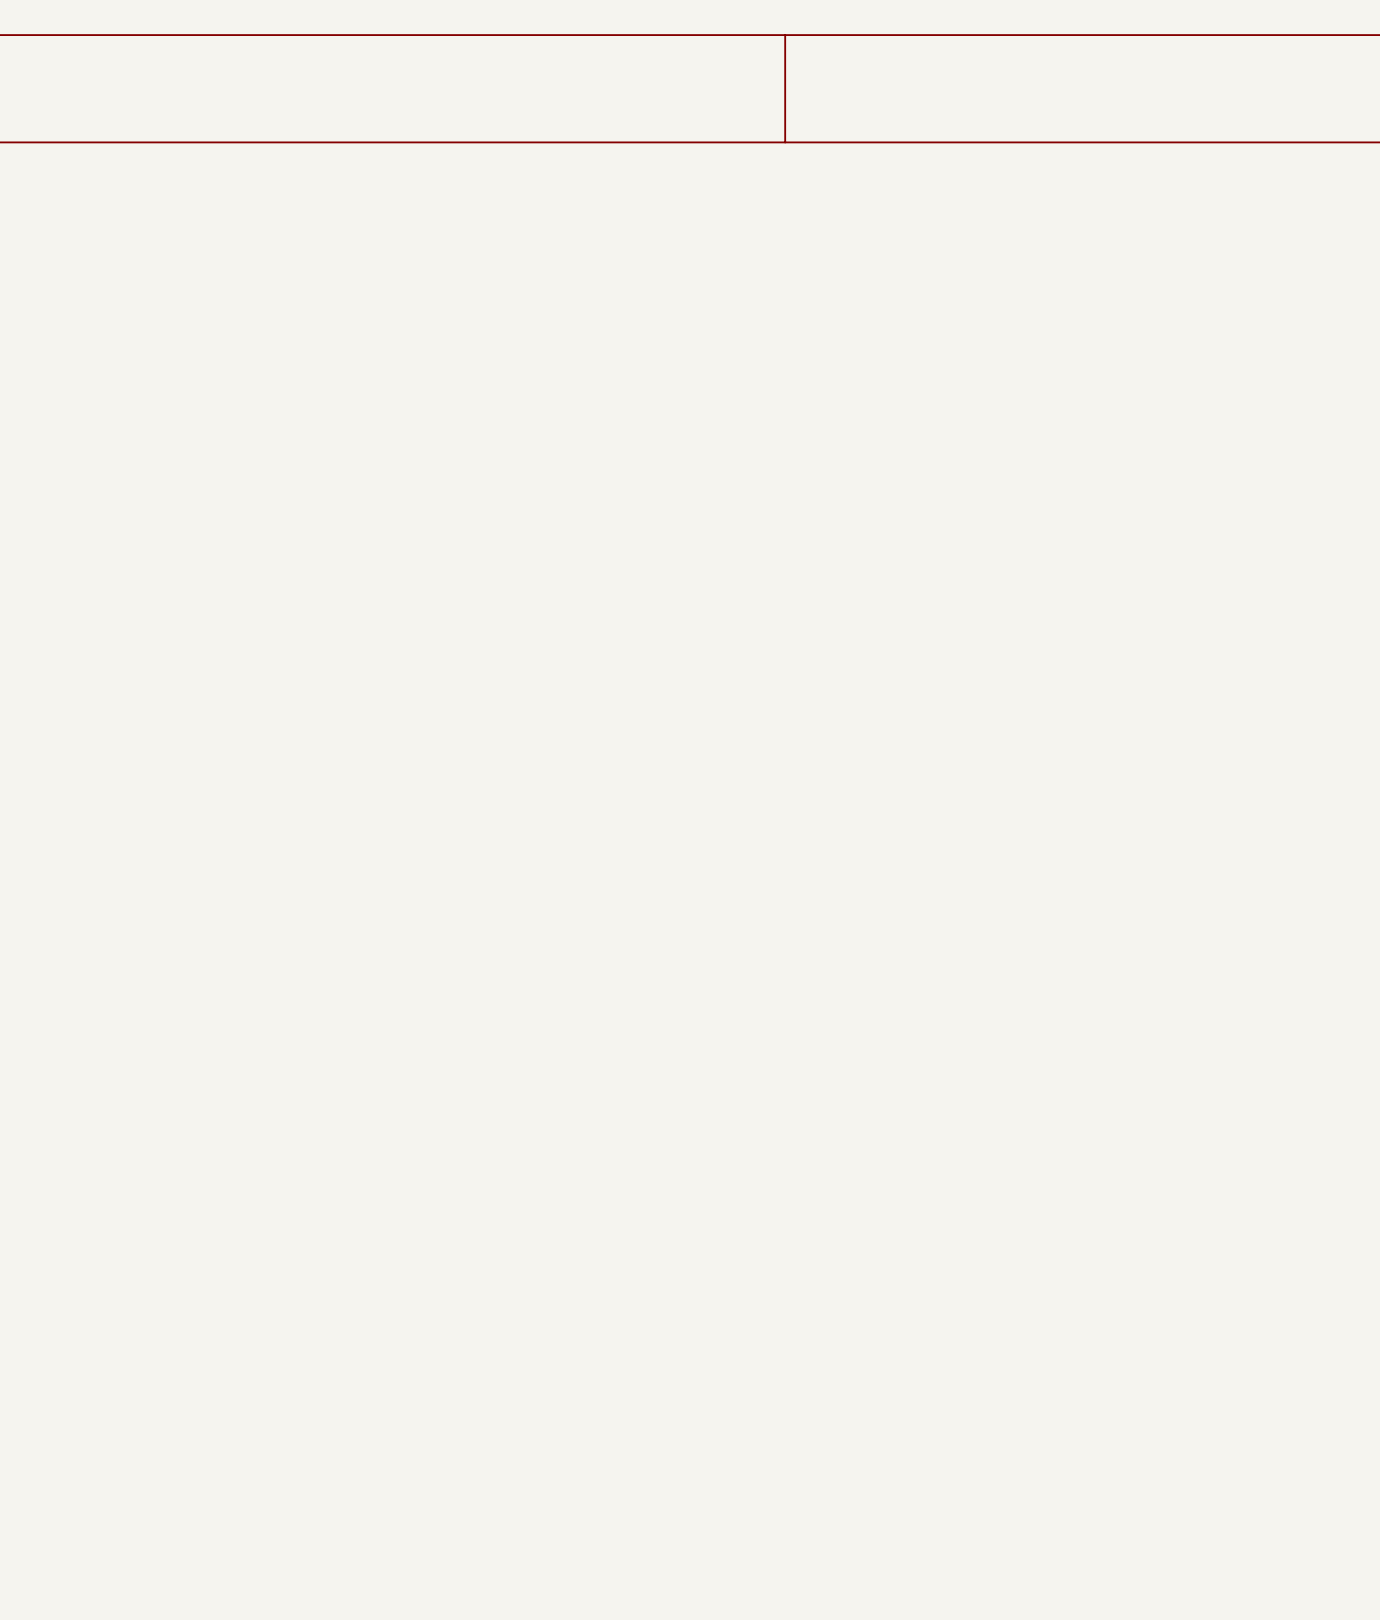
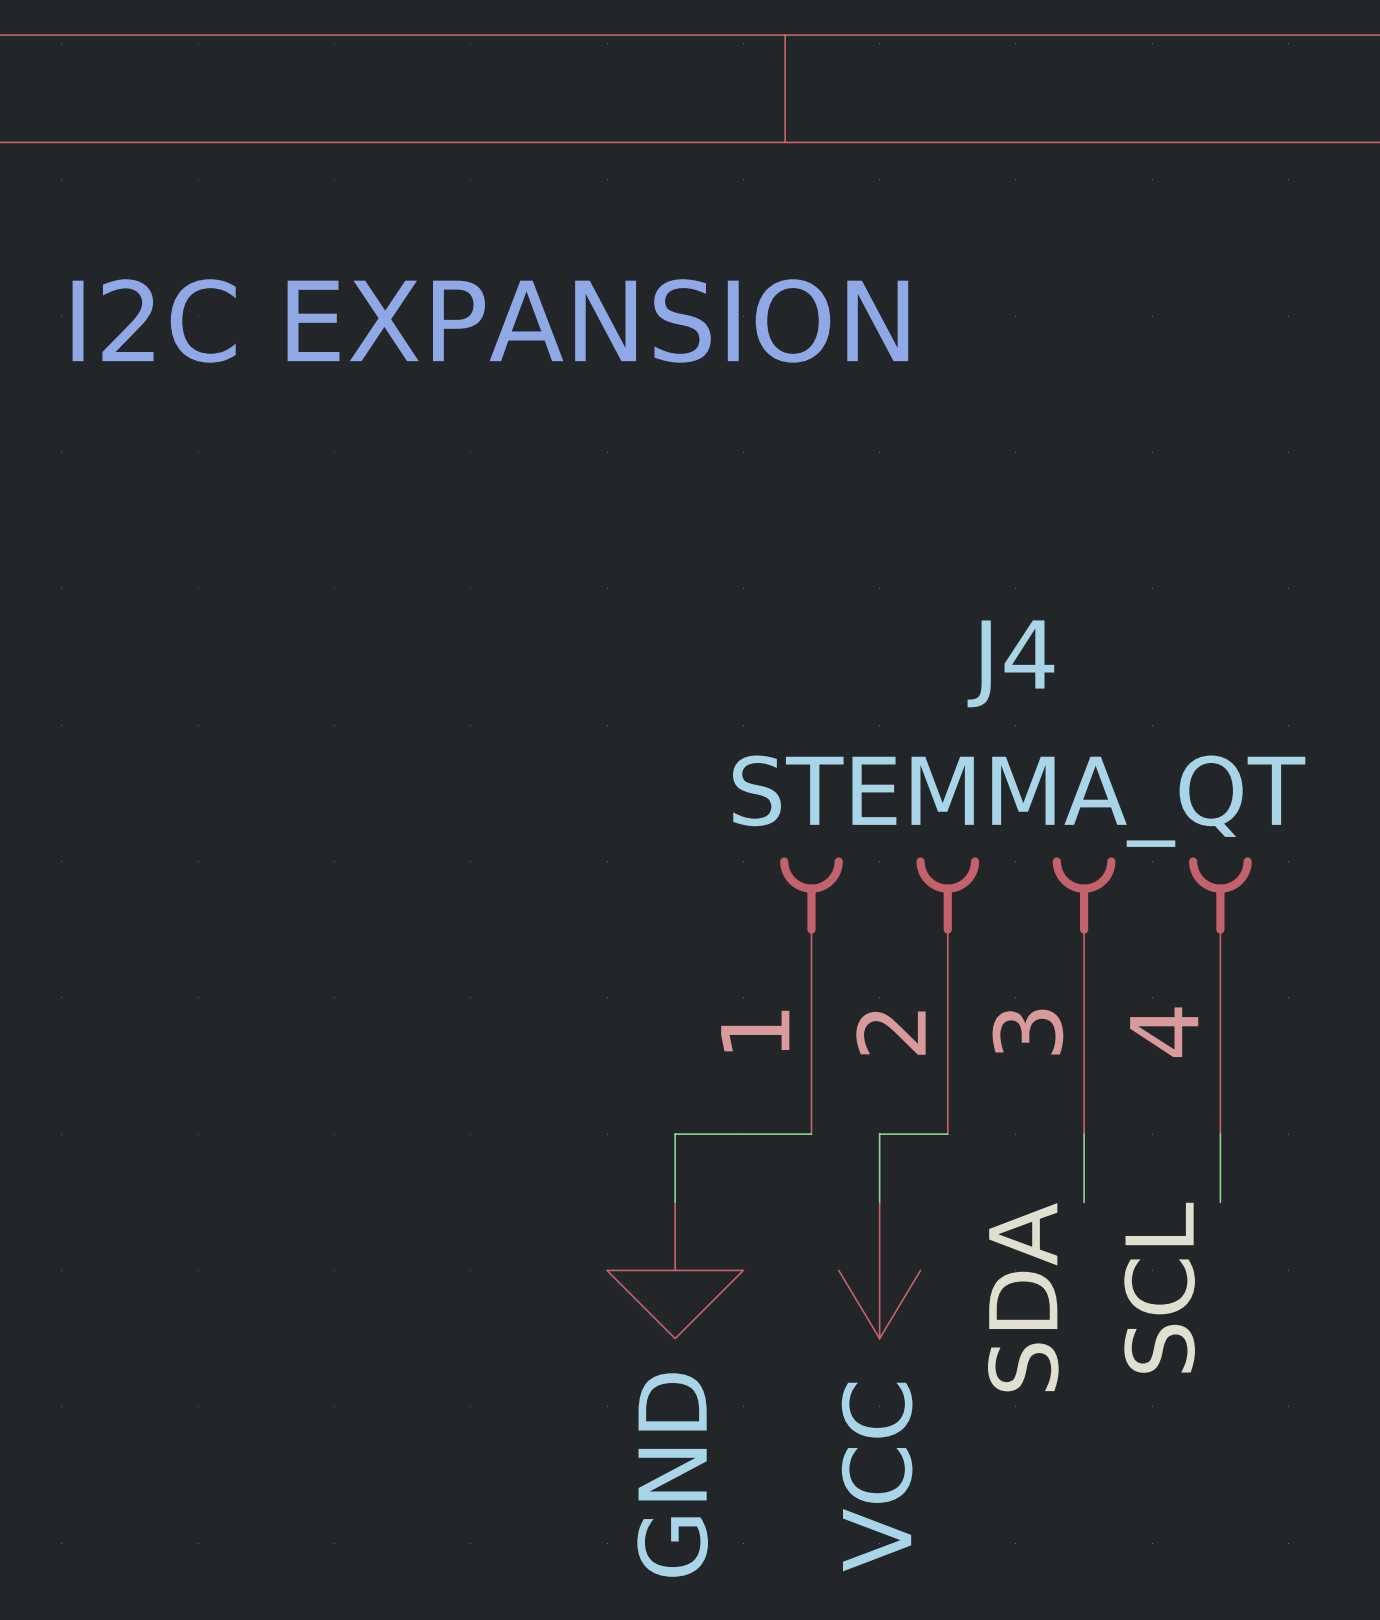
text: none -> I2C EXPANSION (490, 320)
J4: none -> STEMMA_QT (1015, 995)
wire: none -> (811, 1134) (675, 1134) (675, 1202)
wire: none -> (947, 1134) (879, 1134) (879, 1202)
wire: none -> (1084, 1134) (1084, 1202)
wire: none -> (1220, 1134) (1220, 1202)
power symbol: none -> GND (675, 1270)
power symbol: none -> VCC (879, 1270)
label: none -> SCL (1159, 1287)
label: none -> SDA (1023, 1297)

